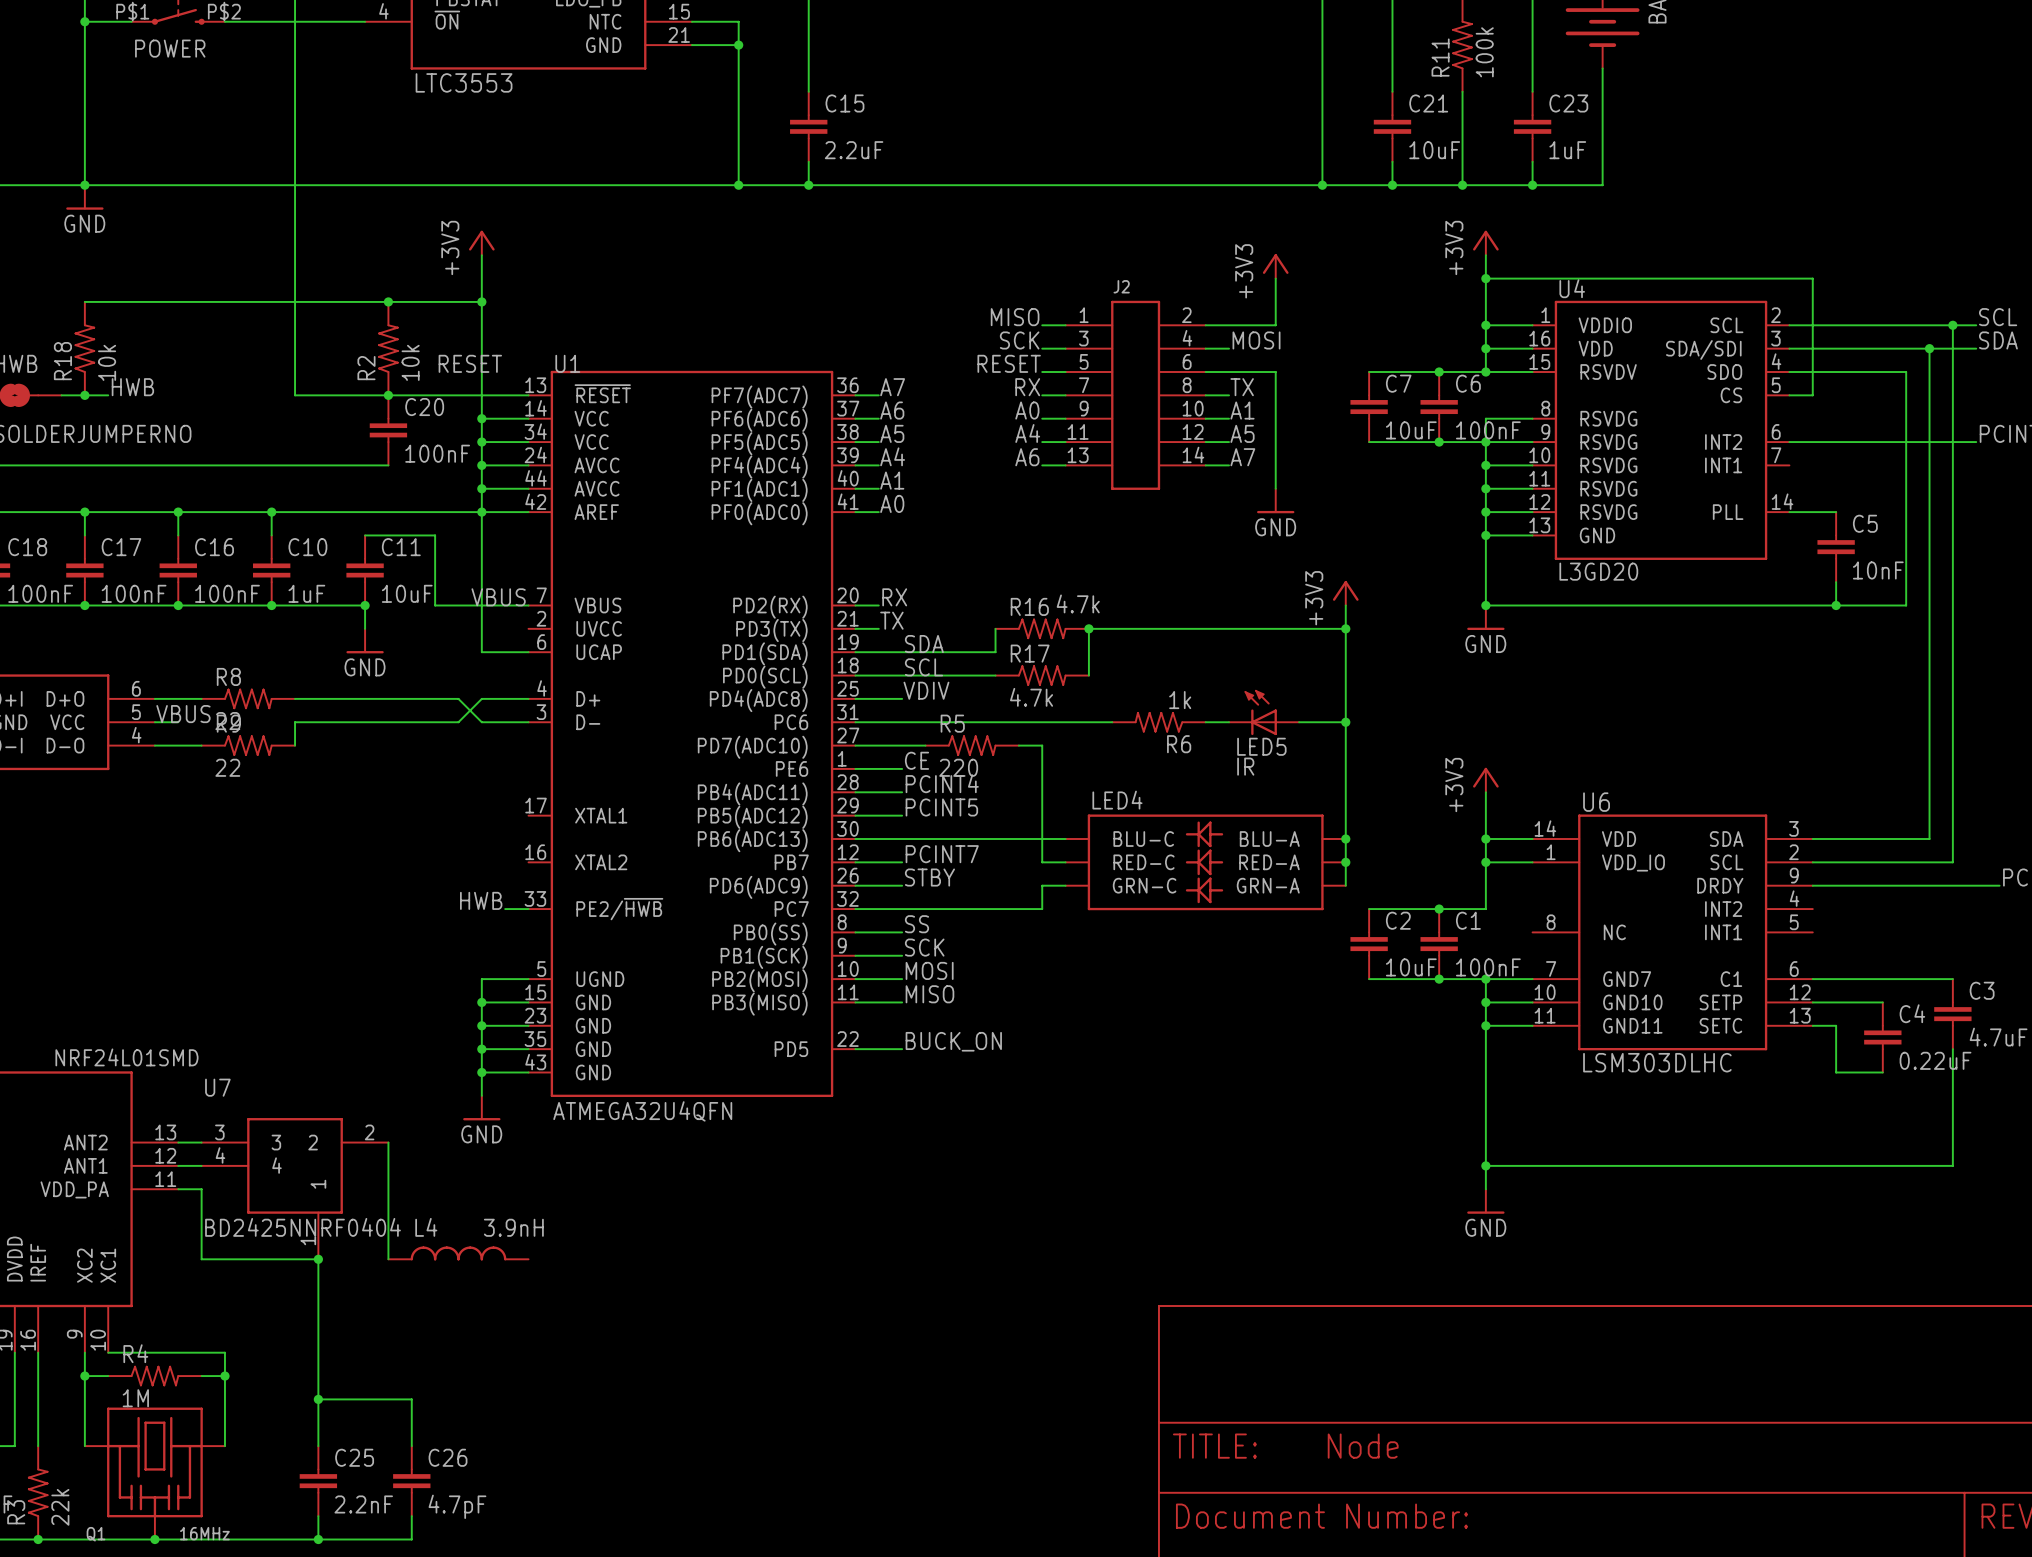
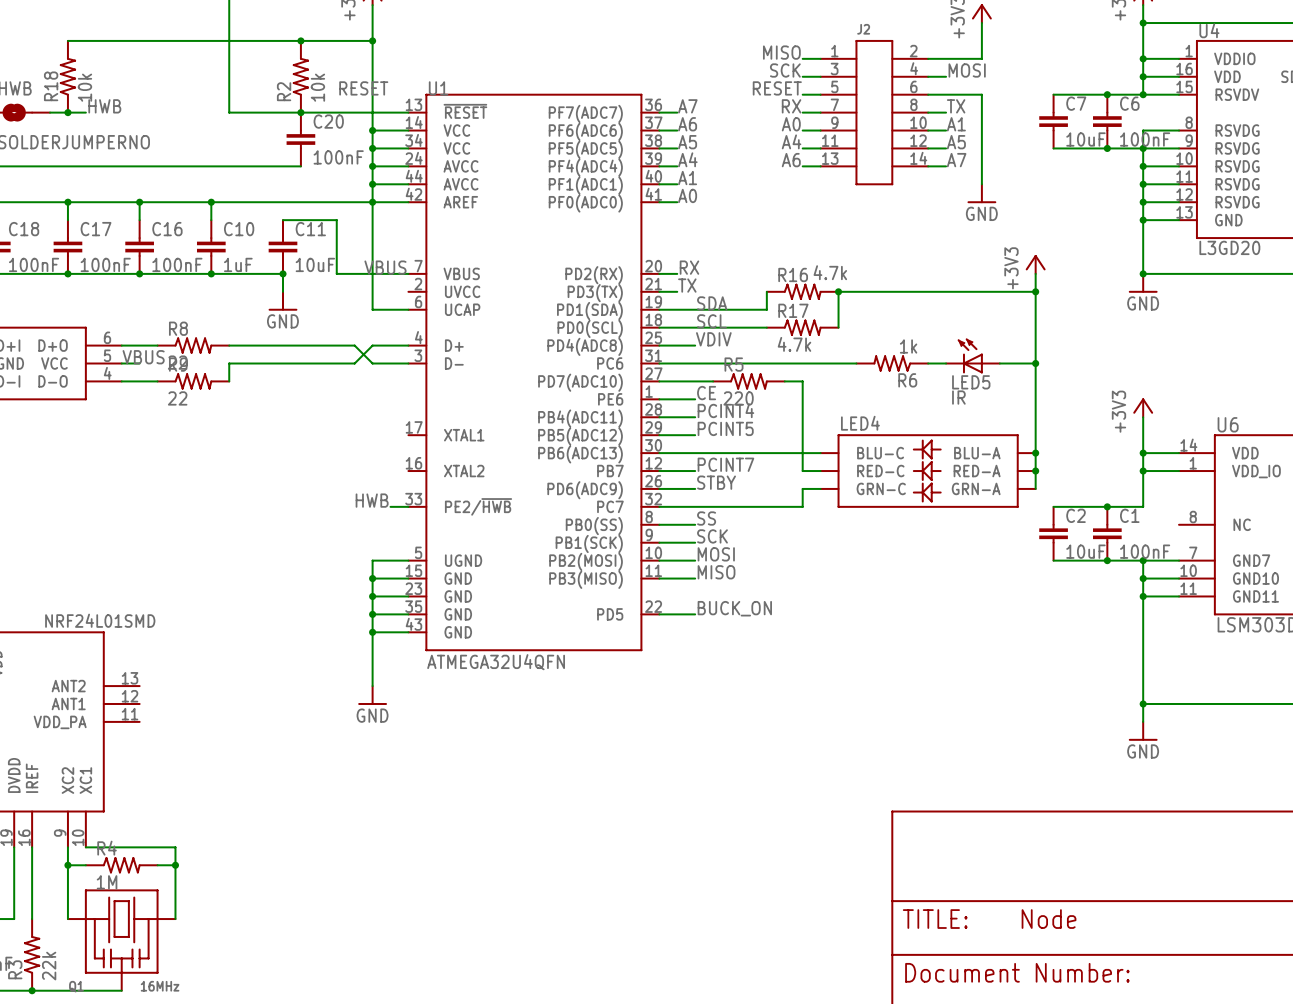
power symbol position: GND (481, 1108) -> GND (372, 695)
wire: (178, 1142) (201, 1142) -> none
wire: (388, 1142) (388, 1259) -> none
wire: (178, 1165) (201, 1165) -> none
U7: BD2425NNRF0404 (295, 1188) -> none
wire: (178, 1189) (201, 1189) (201, 1259) (318, 1259) (318, 1446) -> none
L4: 3.9nH (458, 1253) -> none
junction: (318, 1259) -> none
wire: (318, 1399) (411, 1399) (411, 1446) -> none
junction: (318, 1399) -> none
C25: 2.2nF (318, 1481) -> none
C26: 4.7pF (411, 1481) -> none
wire: (318, 1516) (318, 1539) -> none
wire: (411, 1516) (411, 1539) (154, 1539) -> none
junction: (154, 1539) -> none
junction: (318, 1539) -> none

